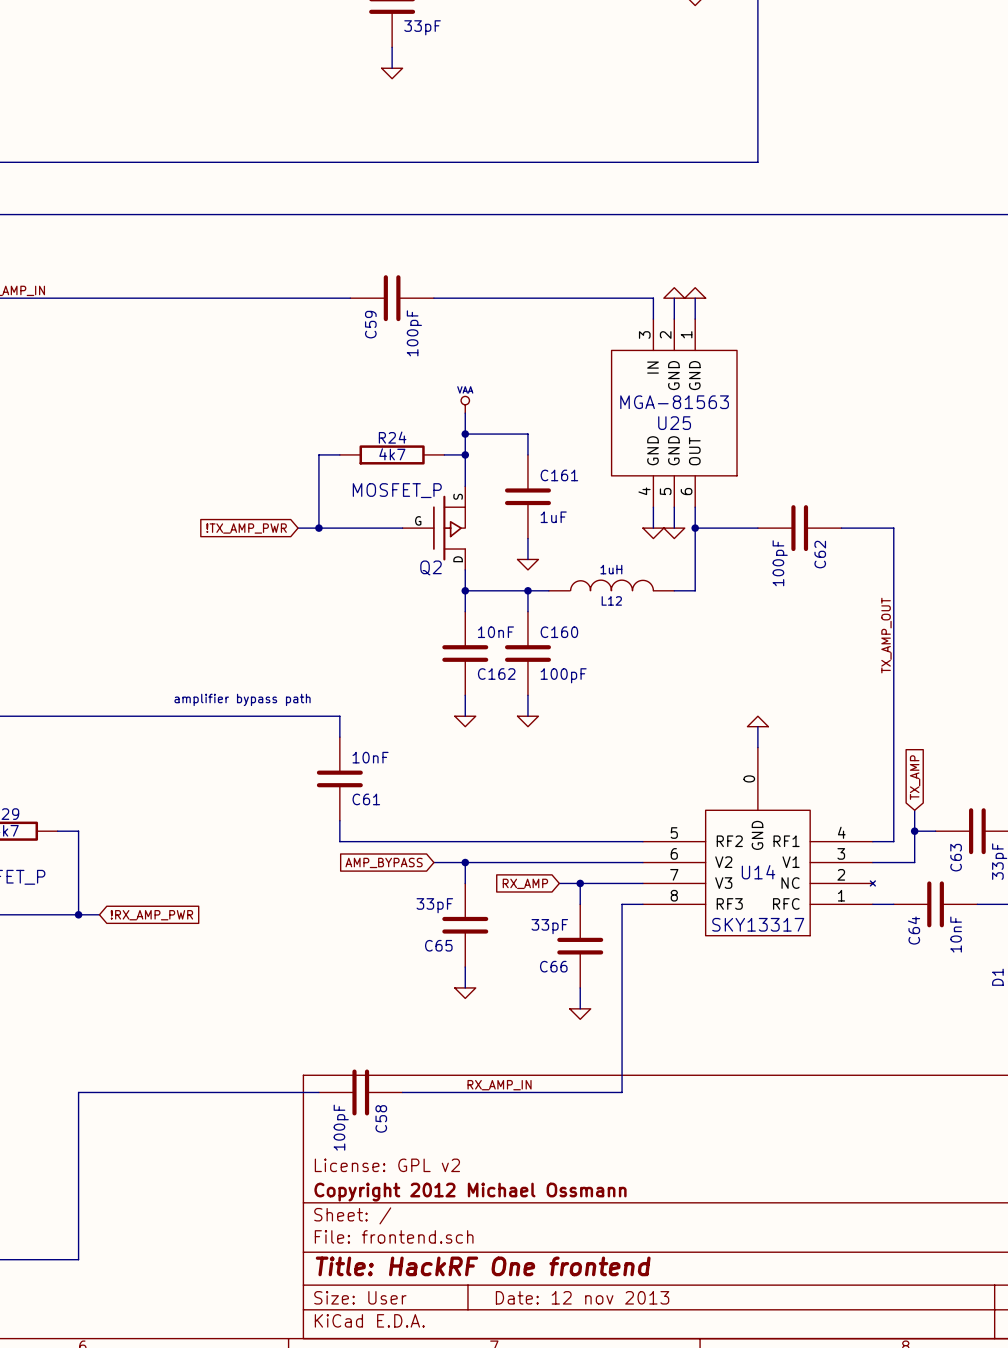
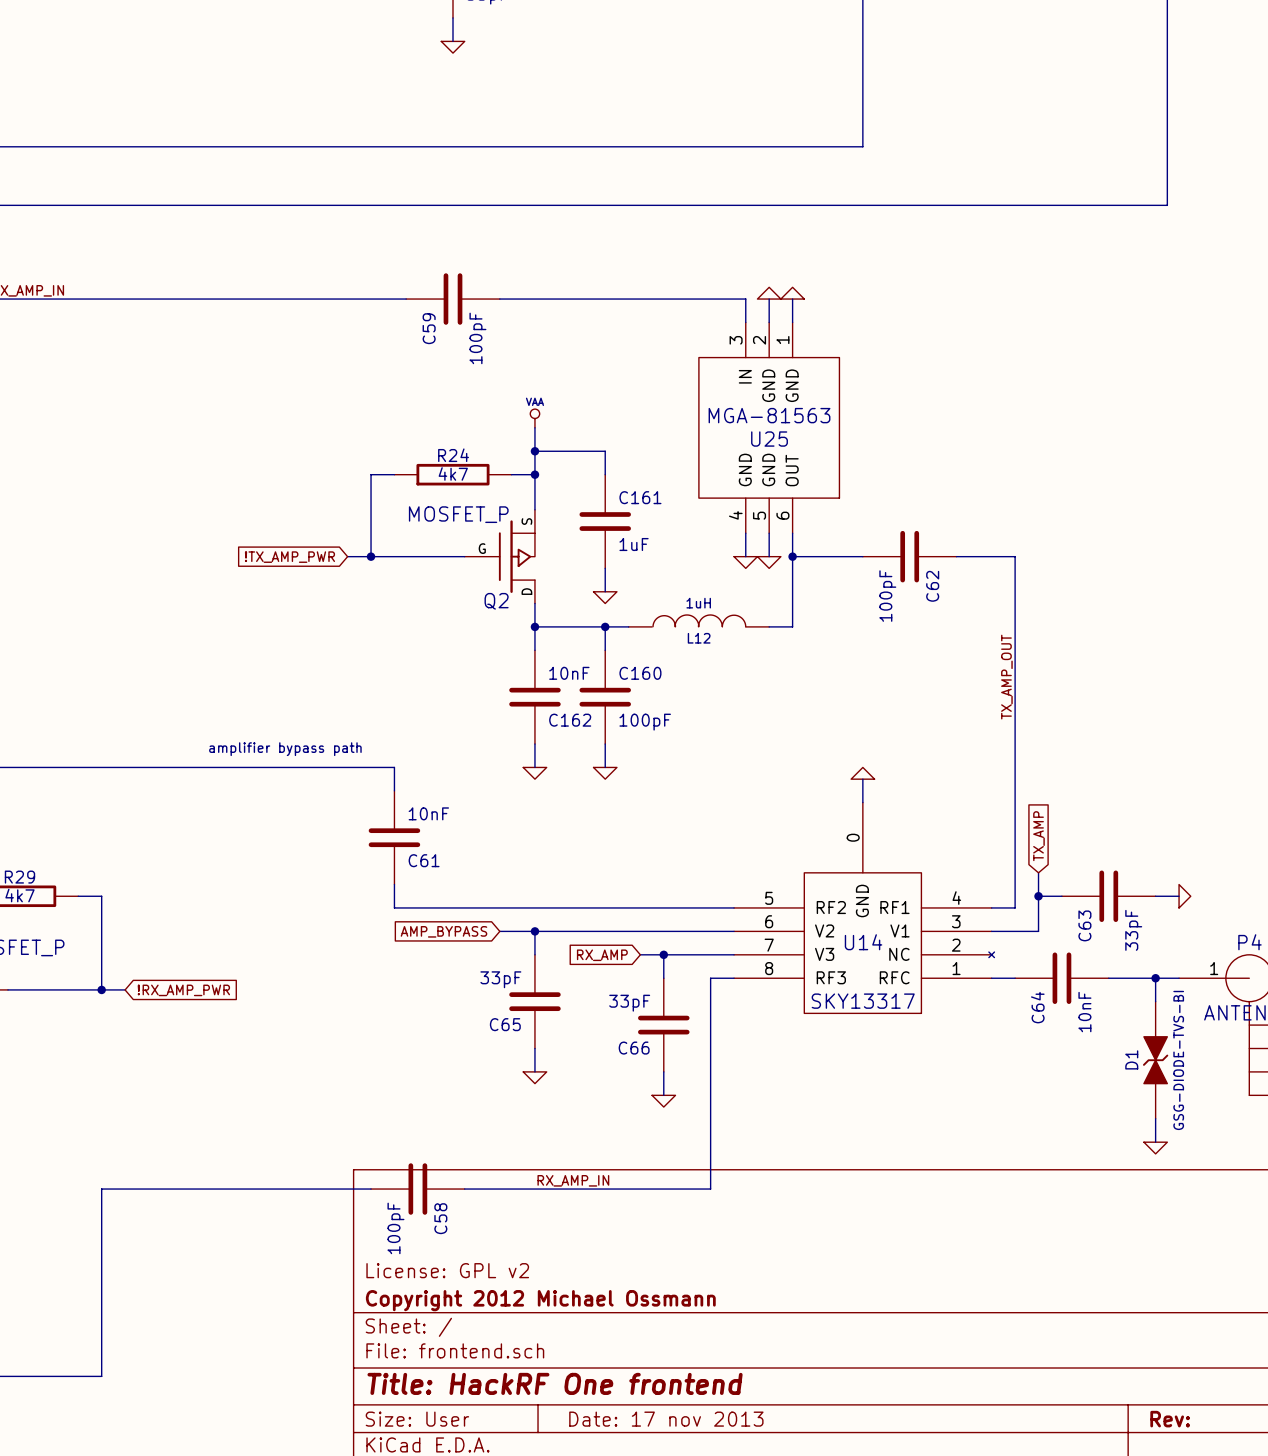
title block: Date: 12 nov 2013 (582, 1297) -> Date: 17 nov 2013 (666, 1419)

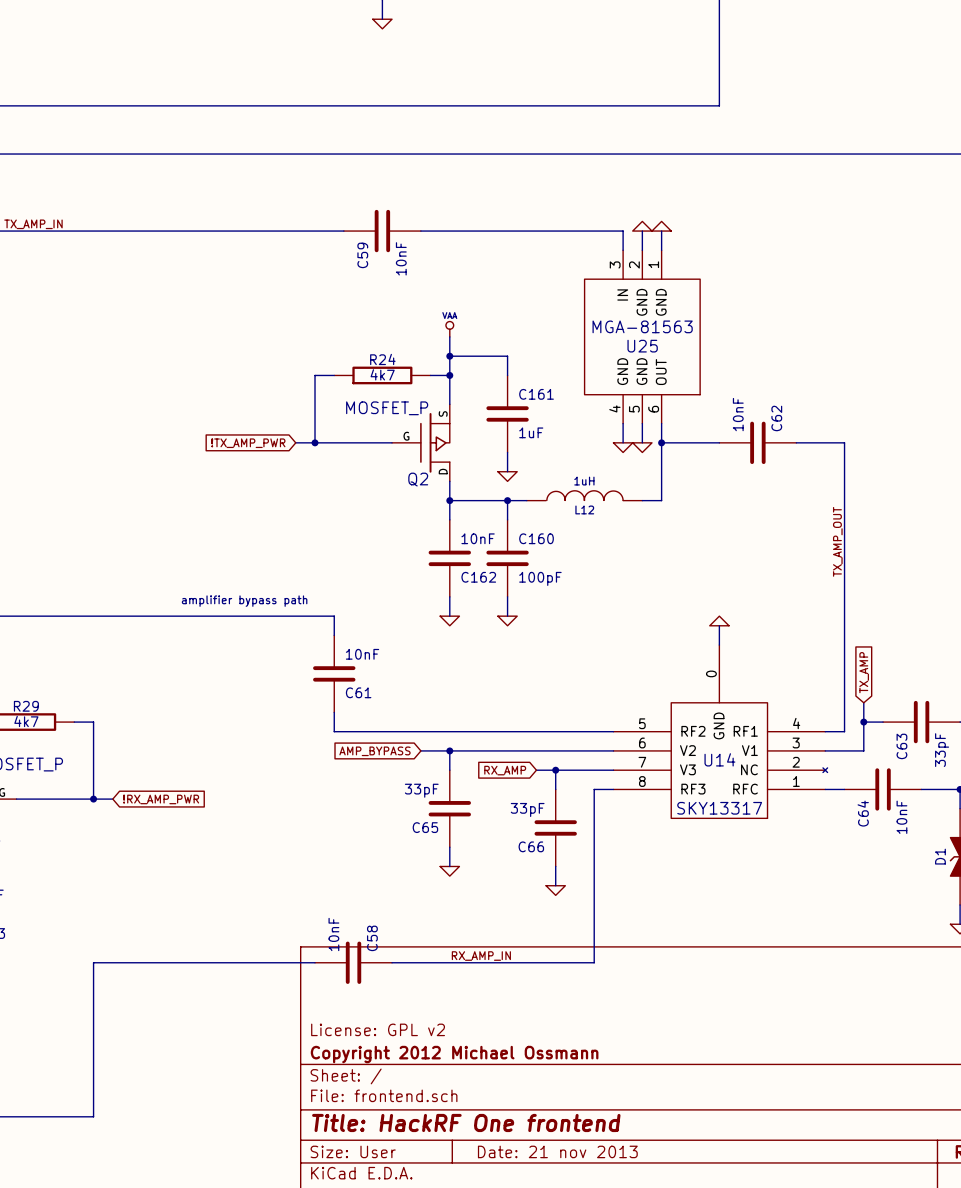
C59 value: 100pF (477, 338) -> 10nF (401, 258)
C62 name position: C62 (932, 586) -> C62 (776, 418)
C62 value: 100pF (887, 596) -> 10nF (738, 414)
C58 name position: C58 (440, 1218) -> C58 (372, 938)
C58 value: 100pF (395, 1228) -> 10nF (333, 934)
title block: Date: 17 nov 2013 (666, 1419) -> Date: 21 nov 2013 (557, 1151)

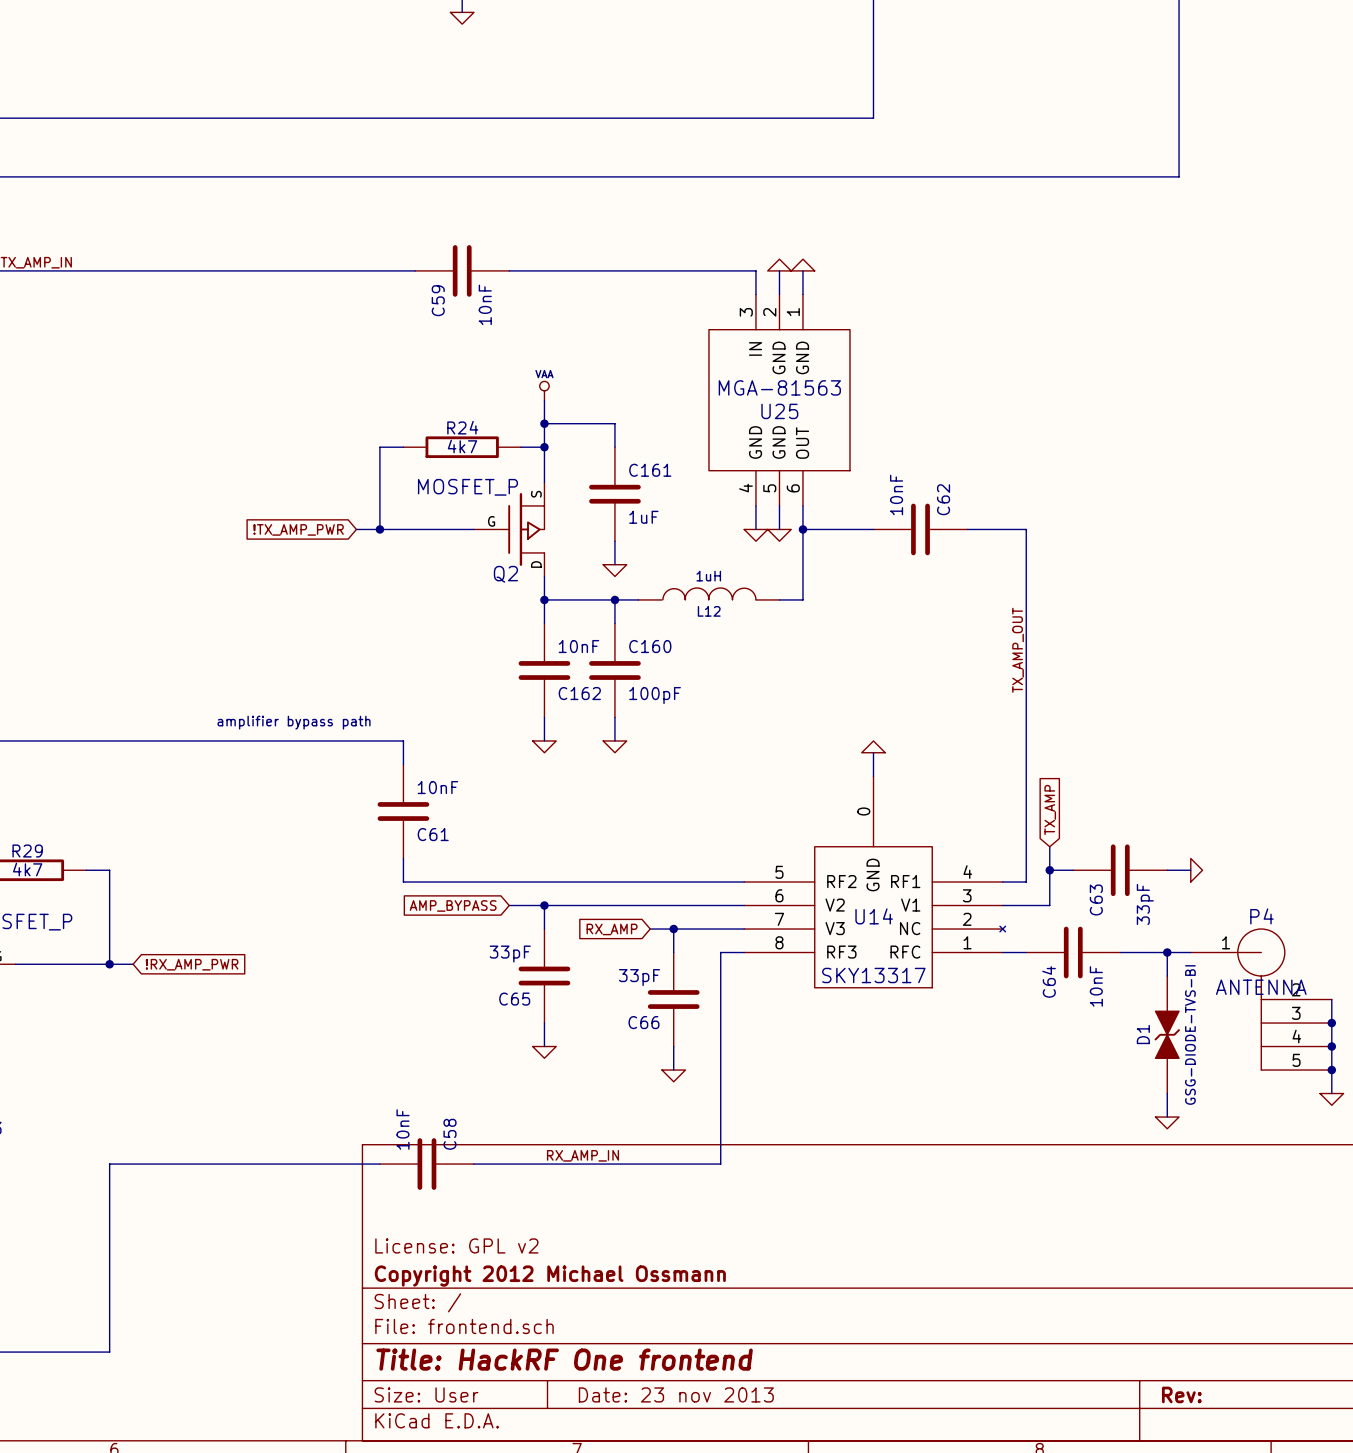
title block: Date: 21 nov 2013 (557, 1151) -> Date: 23 nov 2013 (676, 1394)

